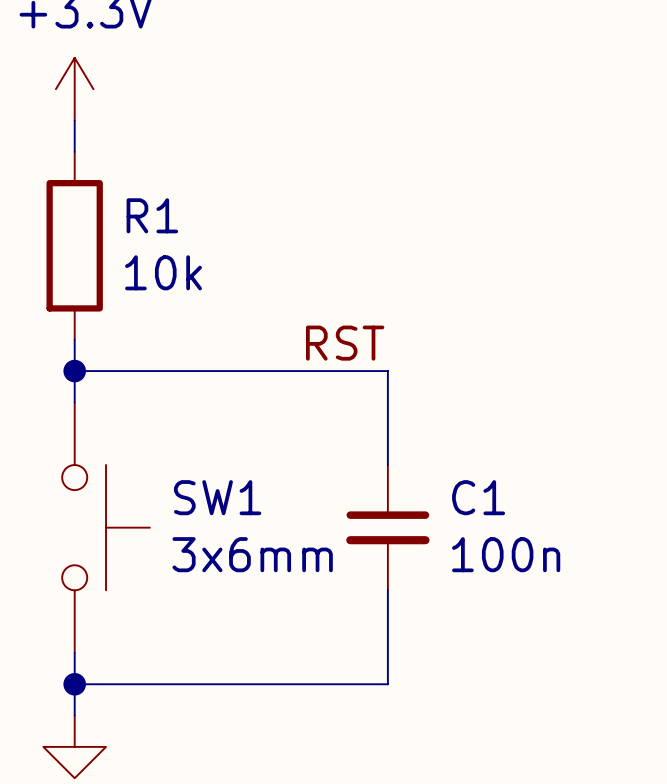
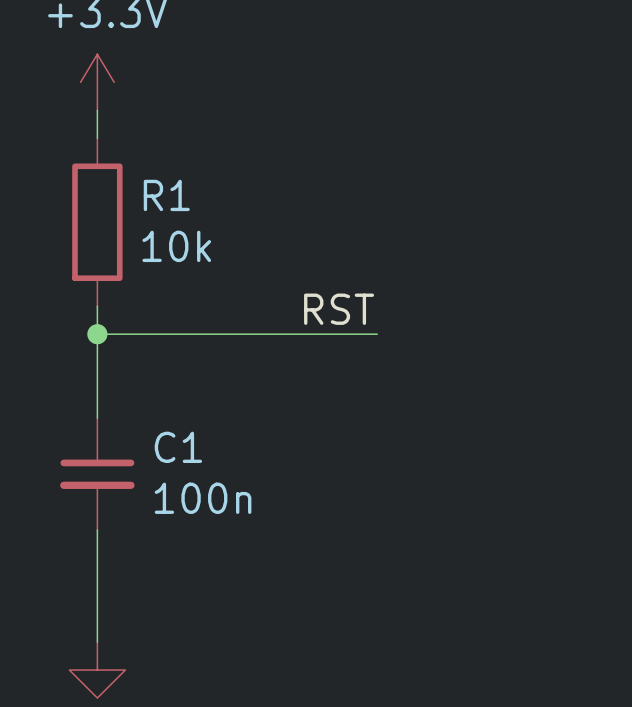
wire: (387, 371) (387, 465) -> none
SW1: 3x6mm (106, 527) -> none
C1 position: (387, 527) -> (97, 474)
wire: (387, 590) (387, 684) (74, 684) -> none
junction: (74, 684) -> none

